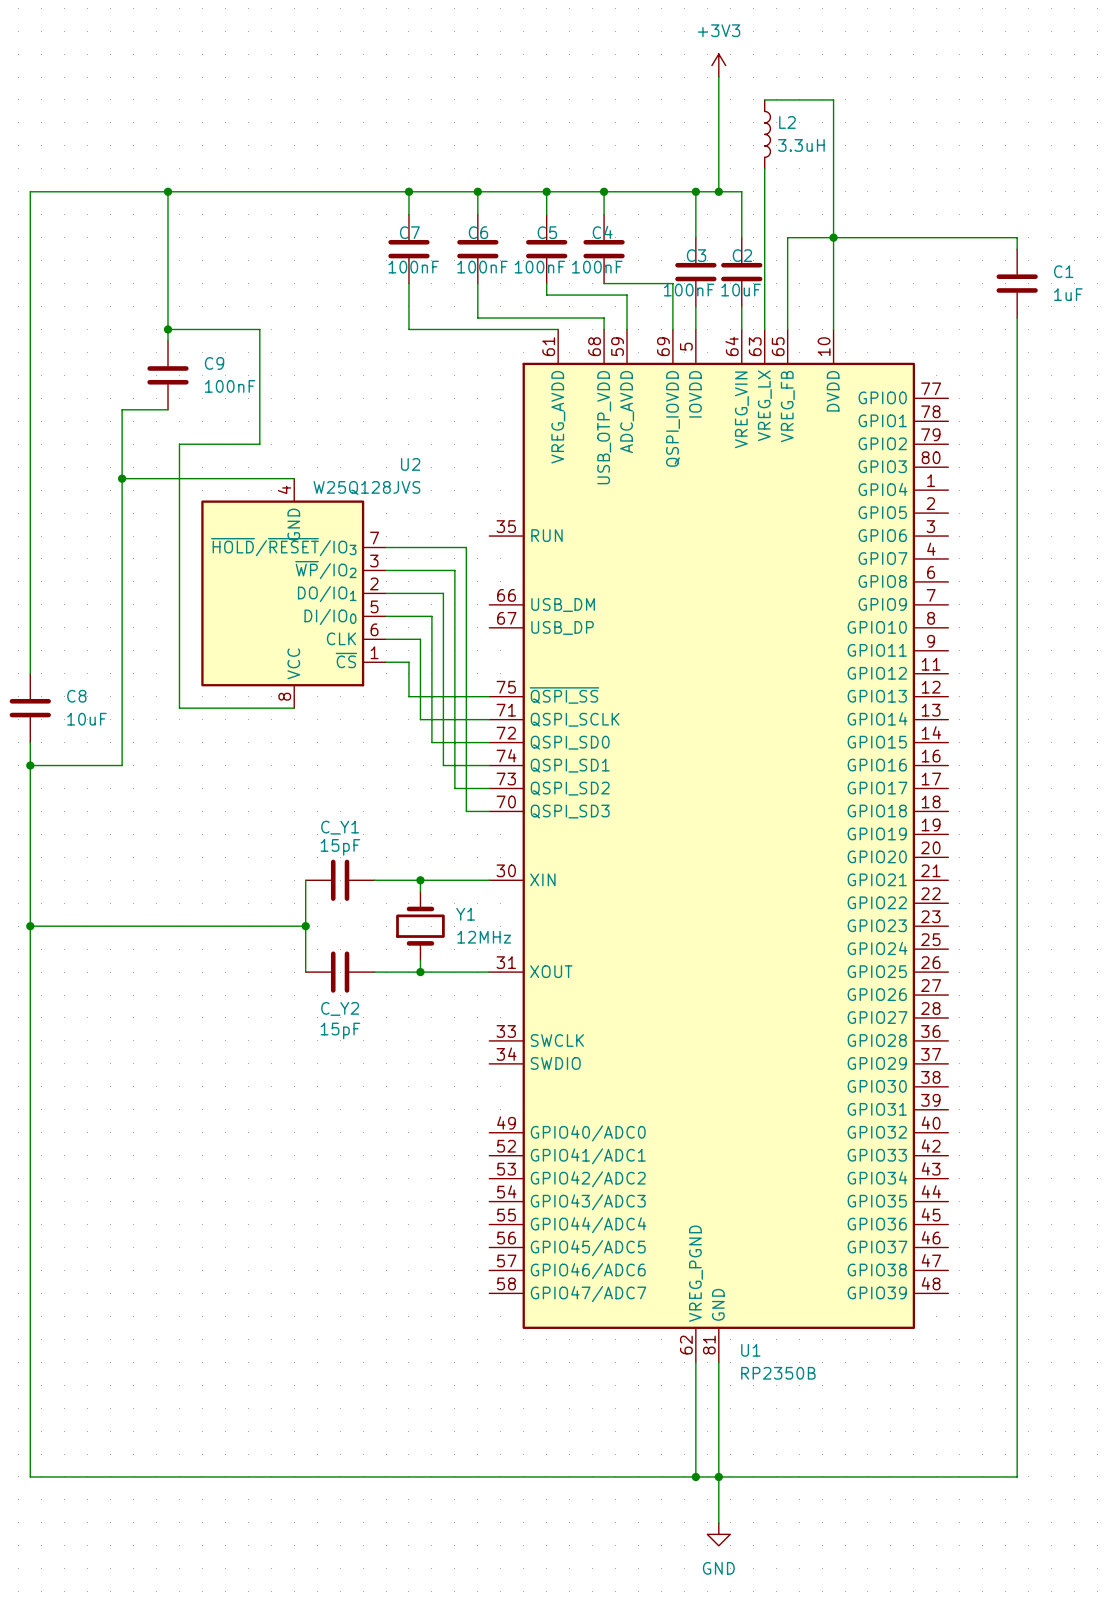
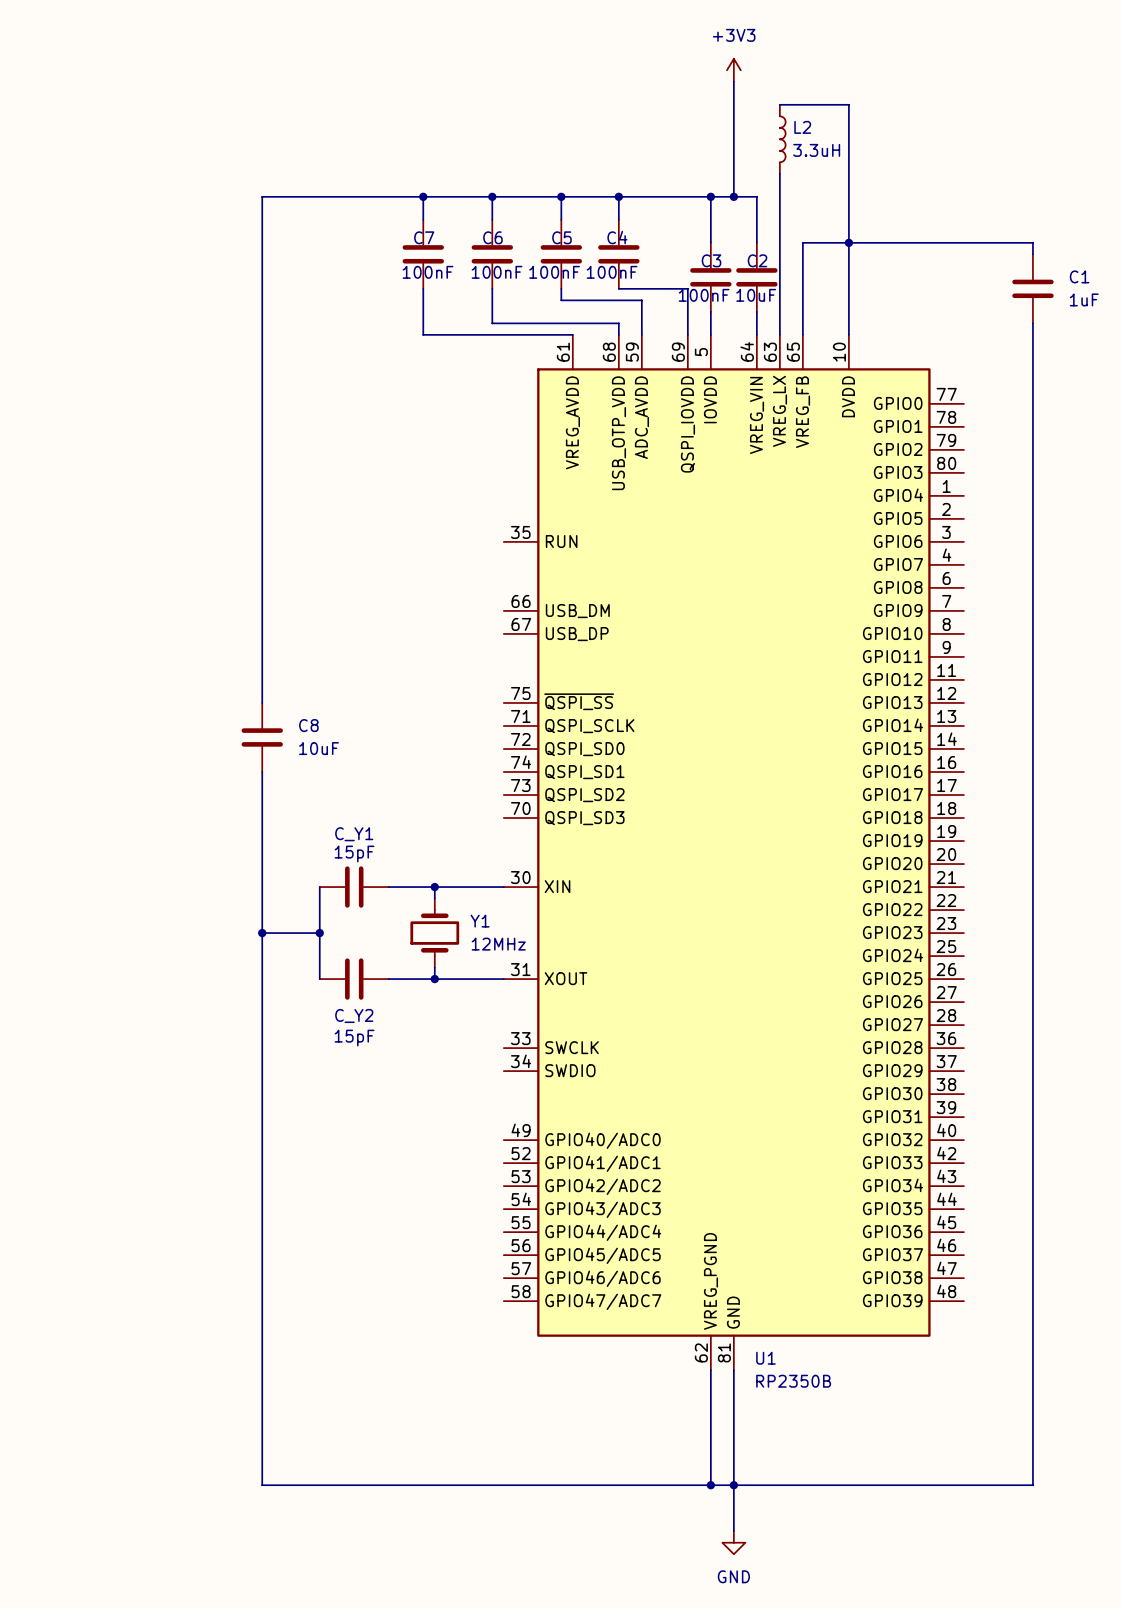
wire: (168, 191) (168, 340) -> none
junction: (168, 191) -> none
wire: (248, 191) (30, 191) (30, 673) -> (262, 196) (262, 702)
wire: (168, 329) (259, 329) (259, 444) (179, 444) (179, 708) (294, 708) -> none
junction: (168, 329) -> none
C9: 100nF (168, 375) -> none
wire: (168, 409) (122, 409) (122, 765) (30, 765) -> none
wire: (122, 478) (294, 478) -> none
junction: (122, 478) -> none
wire: (386, 547) (466, 547) (466, 811) (489, 811) -> none
wire: (386, 570) (454, 570) (454, 788) (489, 788) -> none
U2: W25Q128JVS (293, 593) -> none
wire: (386, 593) (443, 593) (443, 765) (489, 765) -> none
wire: (386, 616) (431, 616) (431, 742) (489, 742) -> none
wire: (386, 639) (420, 639) (420, 719) (489, 719) -> none
wire: (386, 662) (408, 662) (408, 696) (489, 696) -> none
C8 position: (30, 708) -> (262, 737)
wire: (30, 742) (30, 1476) (248, 1476) -> (262, 772) (262, 1485)
junction: (30, 765) -> none
wire: (30, 926) (248, 926) -> none
junction: (30, 926) -> none
junction: none -> (262, 933)

